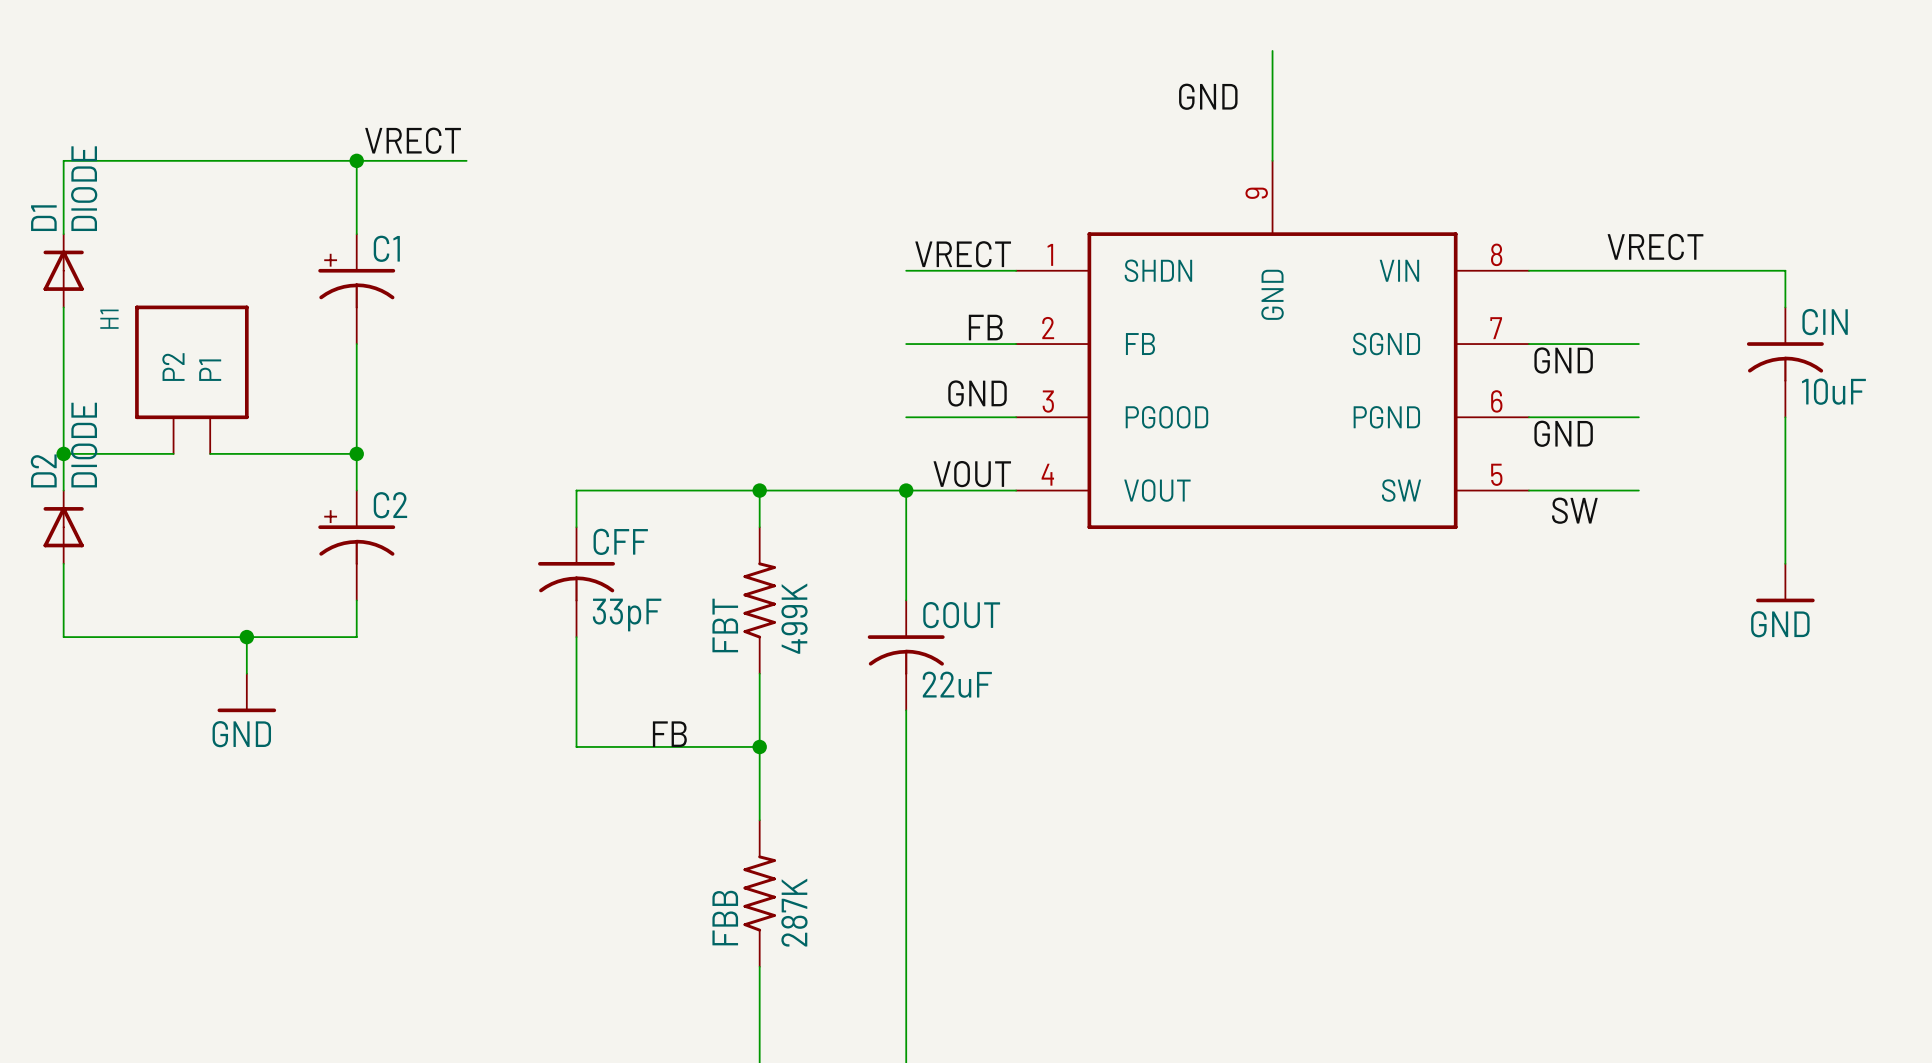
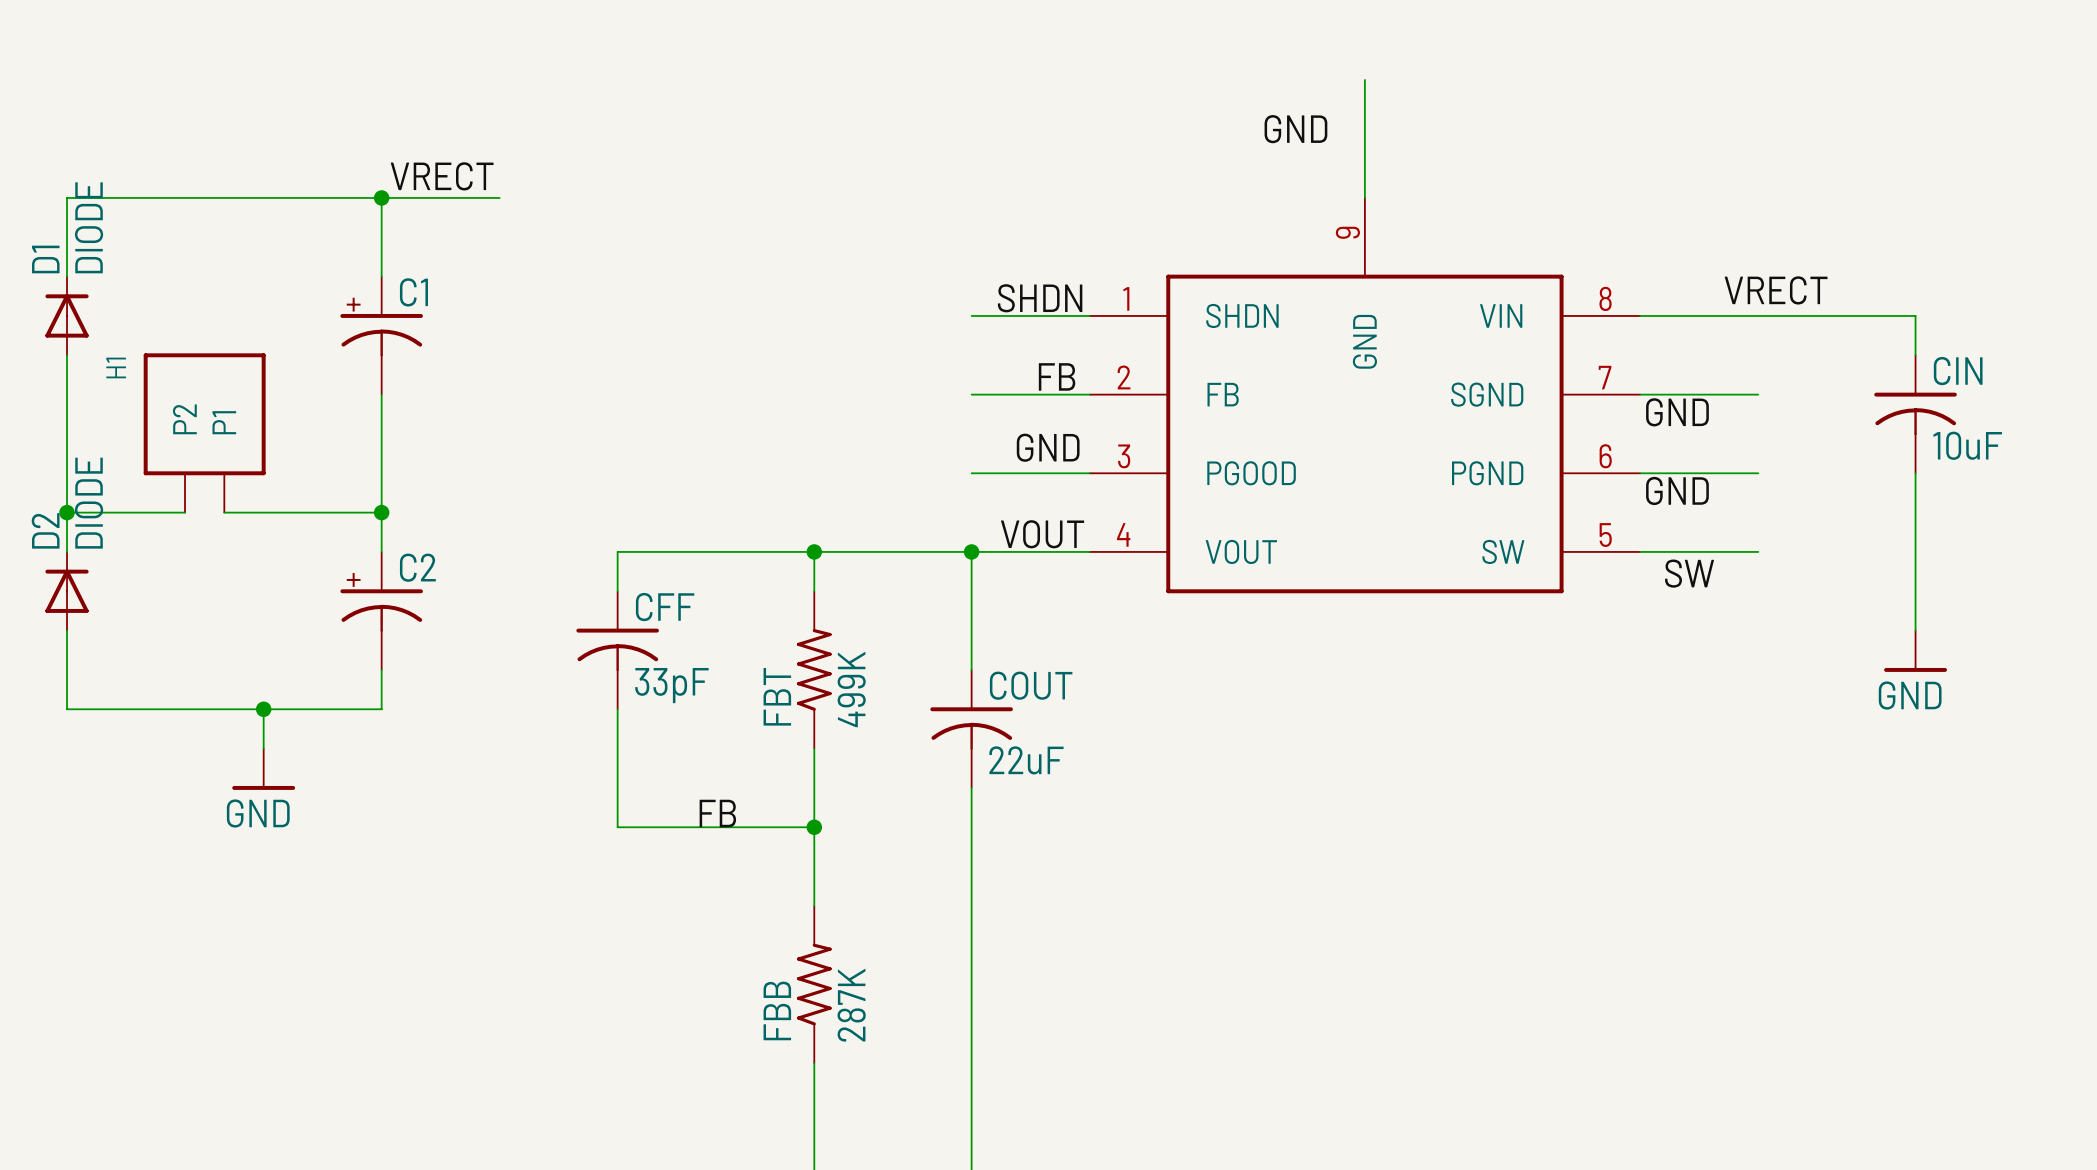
label: VRECT (963, 254) -> SHDN (1040, 298)

